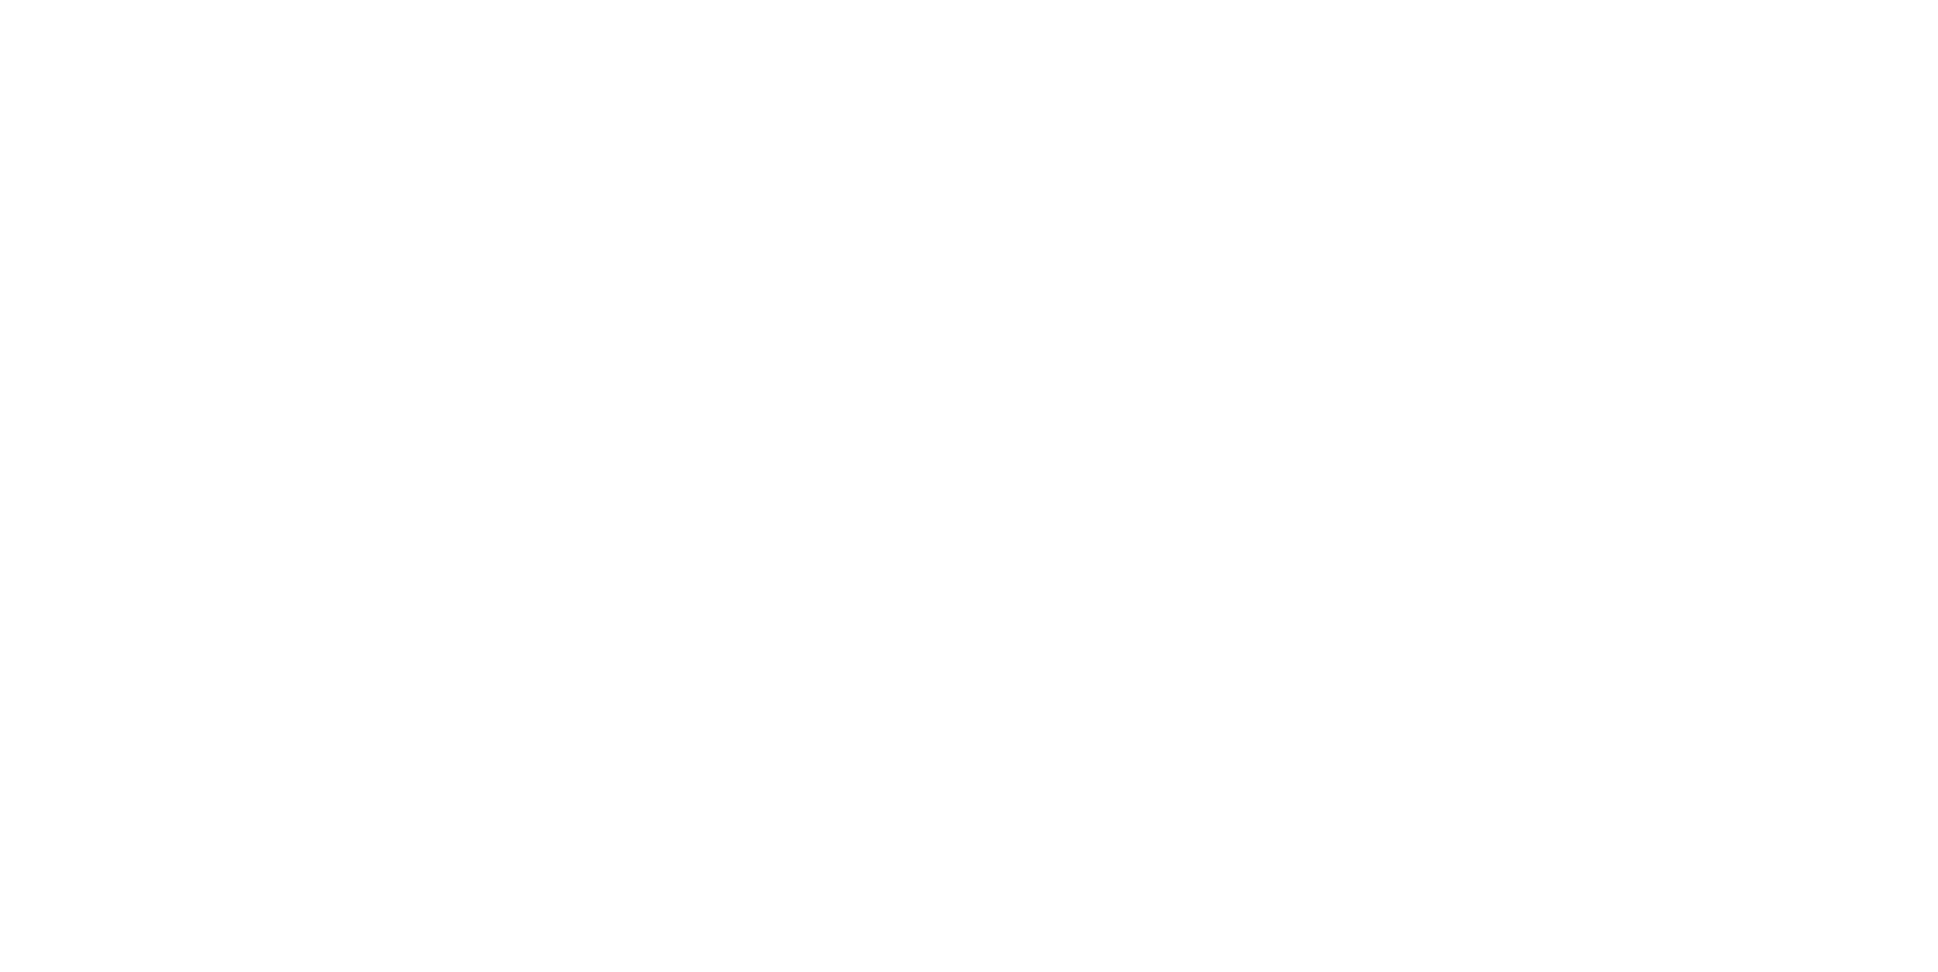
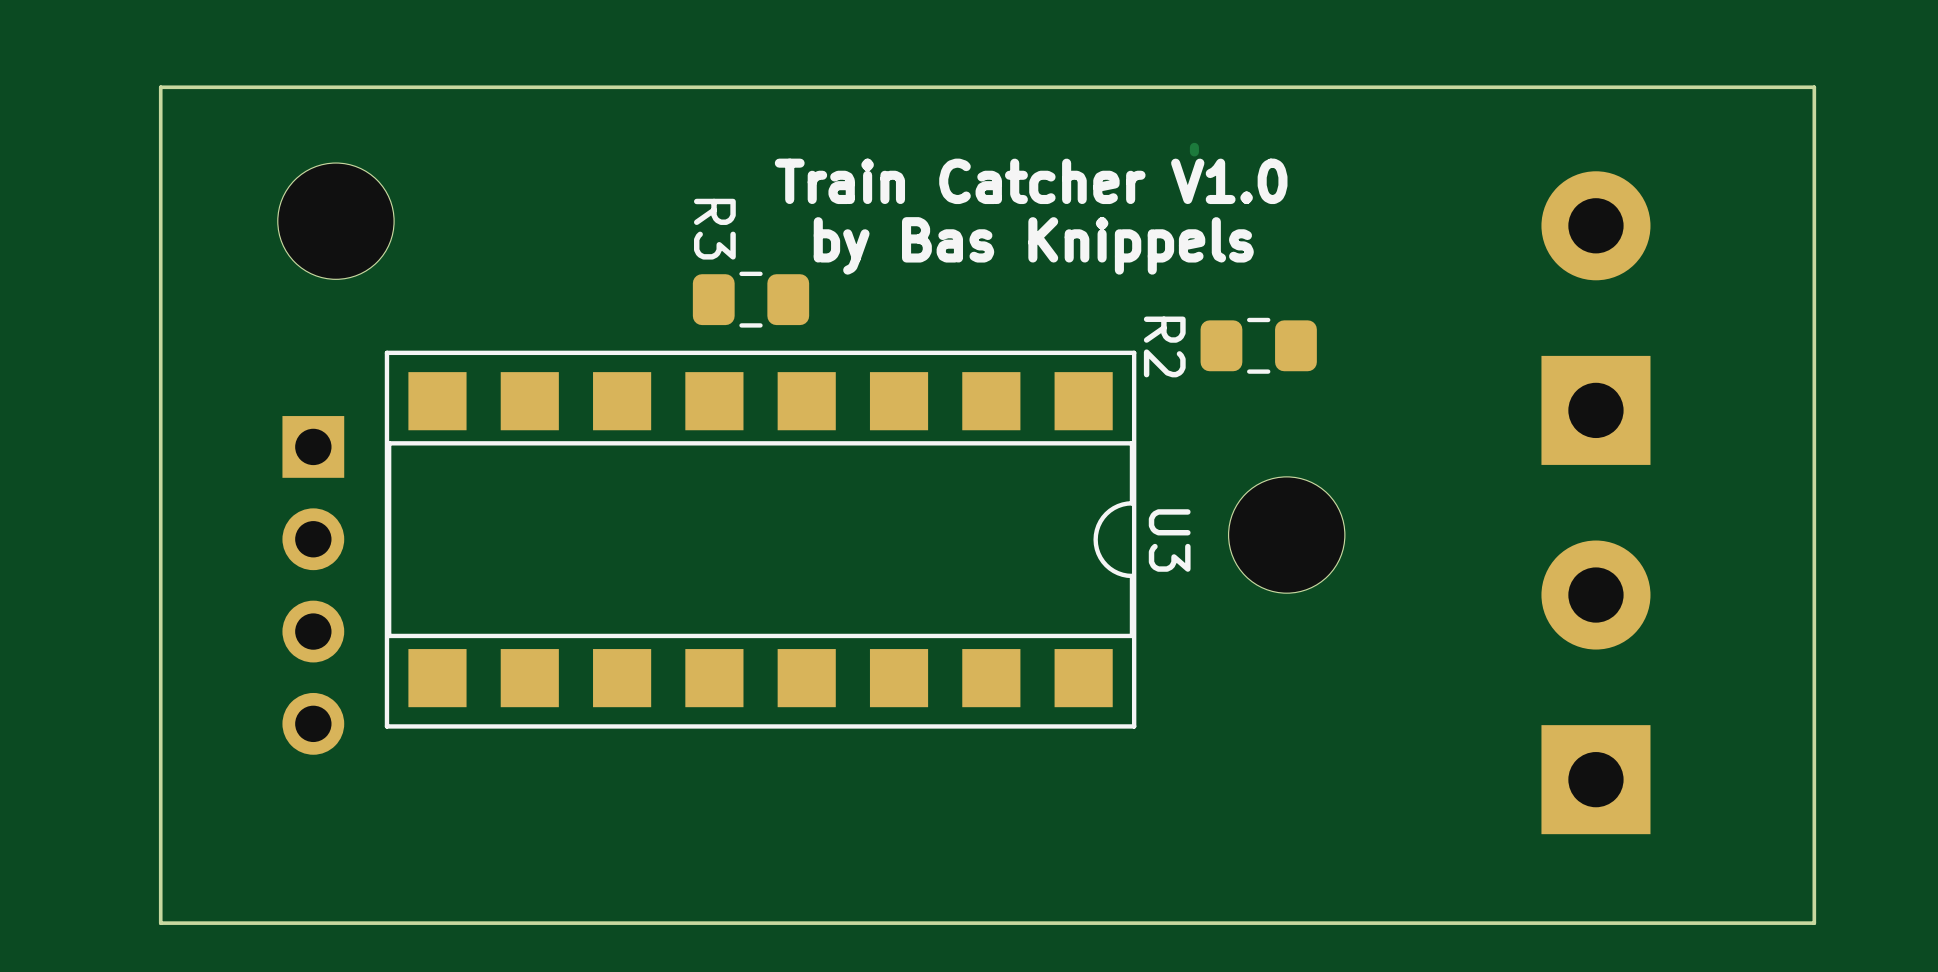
board edge: none -> (1814, 87) (1814, 923) (160, 923) (160, 87) (1814, 87)
track: none -> (1194, 147) (1194, 151)
text: none -> Train Catcher V1.0 (1031, 181)
part: none -> (335, 221)
text: none -> by Bas Knippels (1033, 245)
R3: none -> (751, 299)
part: none -> (1595, 318)
R2: none -> (1258, 345)
part: none -> (1286, 535)
U3: none -> (760, 539)
part: none -> (313, 585)
part: none -> (1595, 687)

